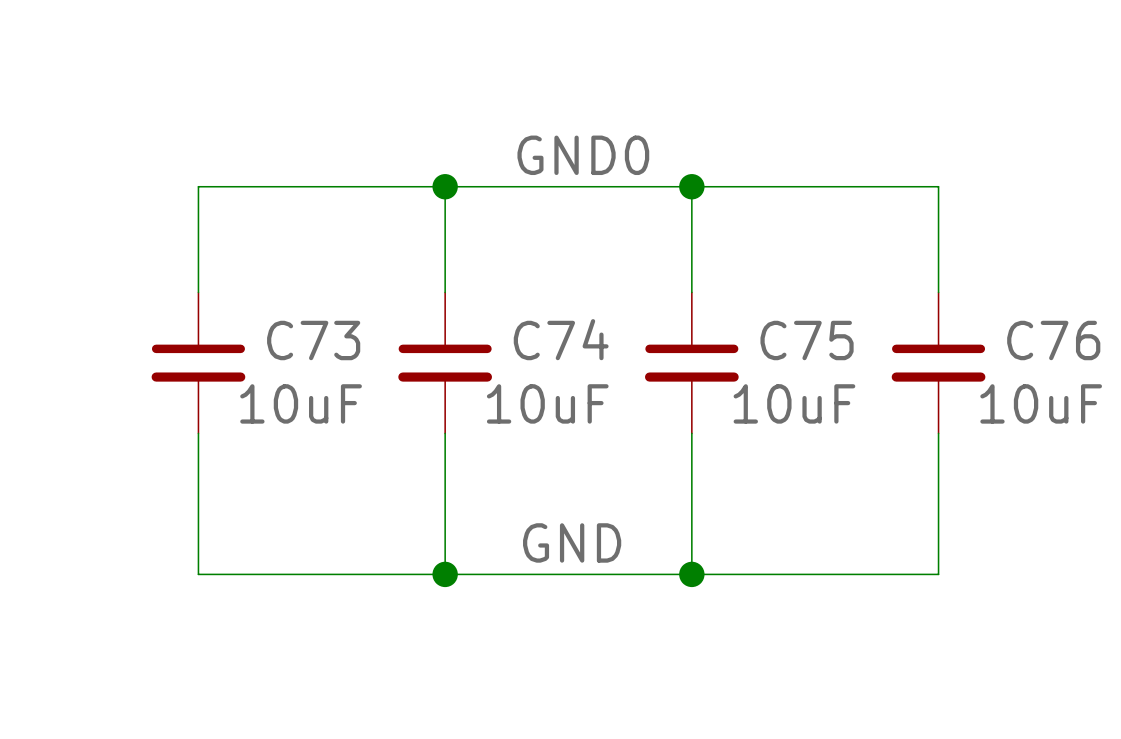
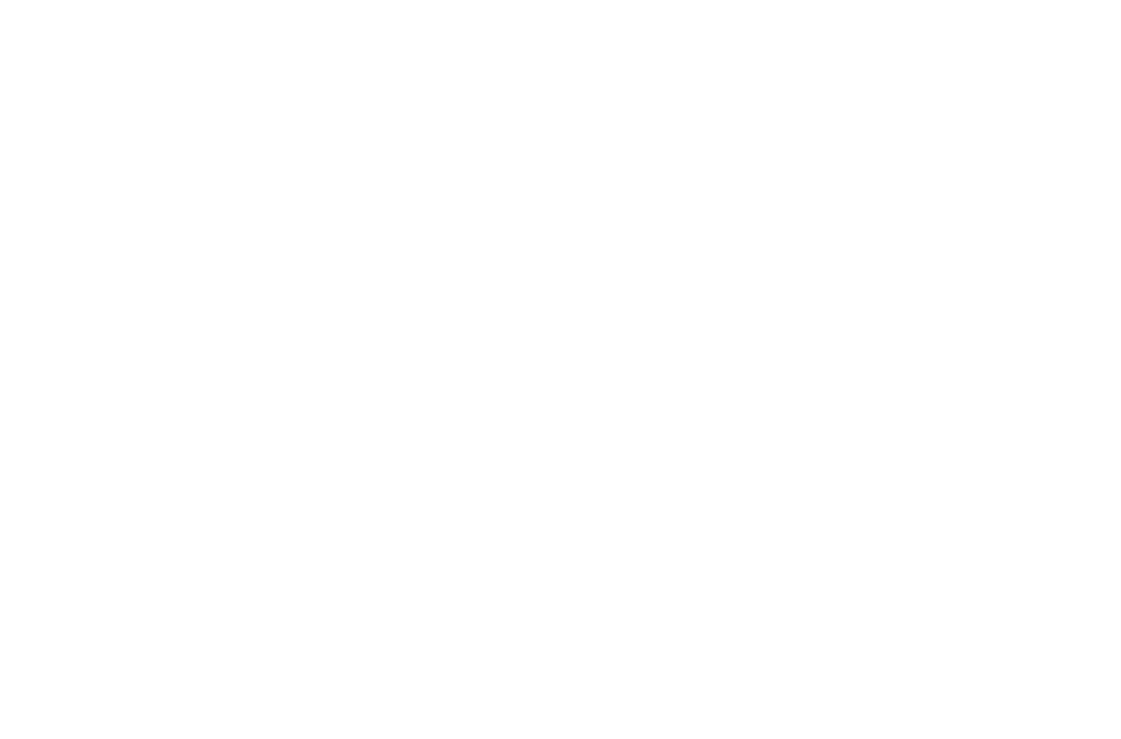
label: GND0 (583, 155) -> none
wire: (445, 186) (445, 292) -> none
junction: (445, 186) -> none
wire: (691, 186) (691, 292) -> none
junction: (691, 186) -> none
wire: (198, 292) (198, 186) (938, 186) (938, 292) -> none
C73: 10uF (198, 362) -> none
C74: 10uF (445, 362) -> none
C75: 10uF (691, 362) -> none
C76: 10uF (938, 362) -> none
wire: (198, 433) (198, 574) (938, 574) (938, 433) -> none
wire: (445, 433) (445, 574) -> none
wire: (691, 433) (691, 574) -> none
label: GND (572, 542) -> none
junction: (445, 574) -> none
junction: (691, 574) -> none

